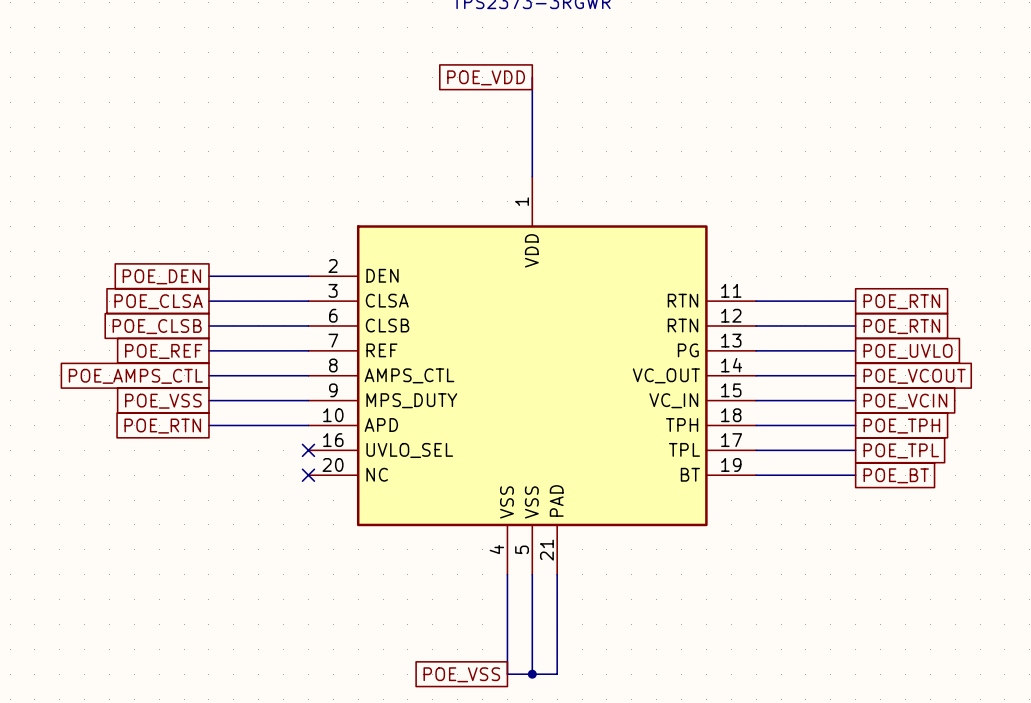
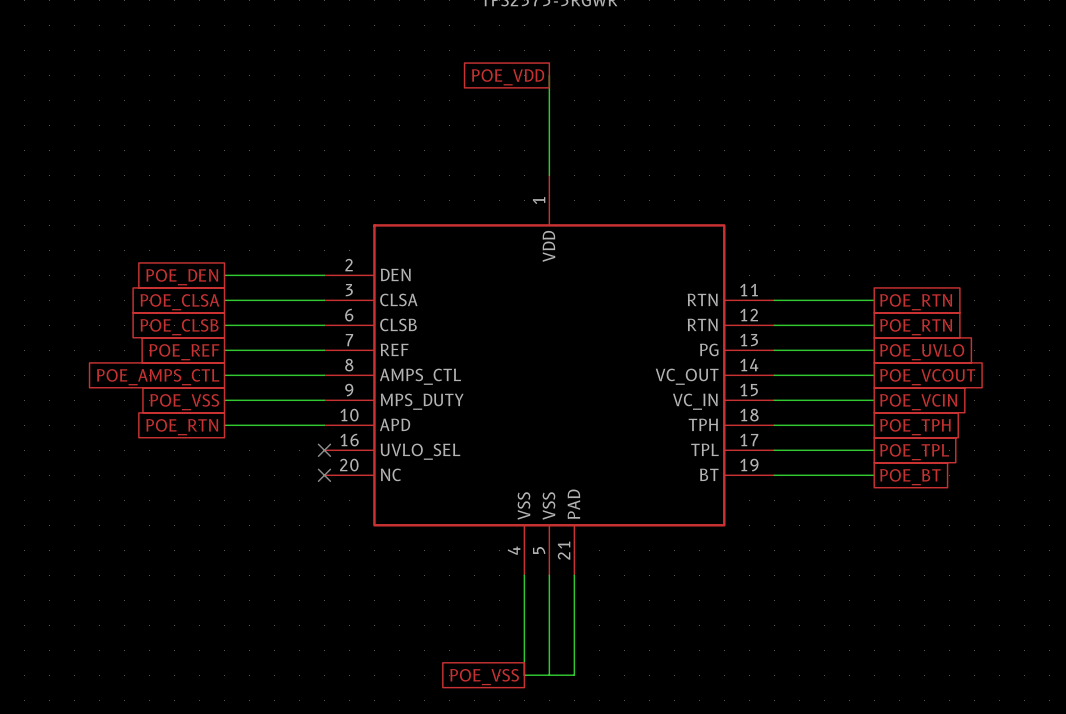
junction: (532, 674) -> none

